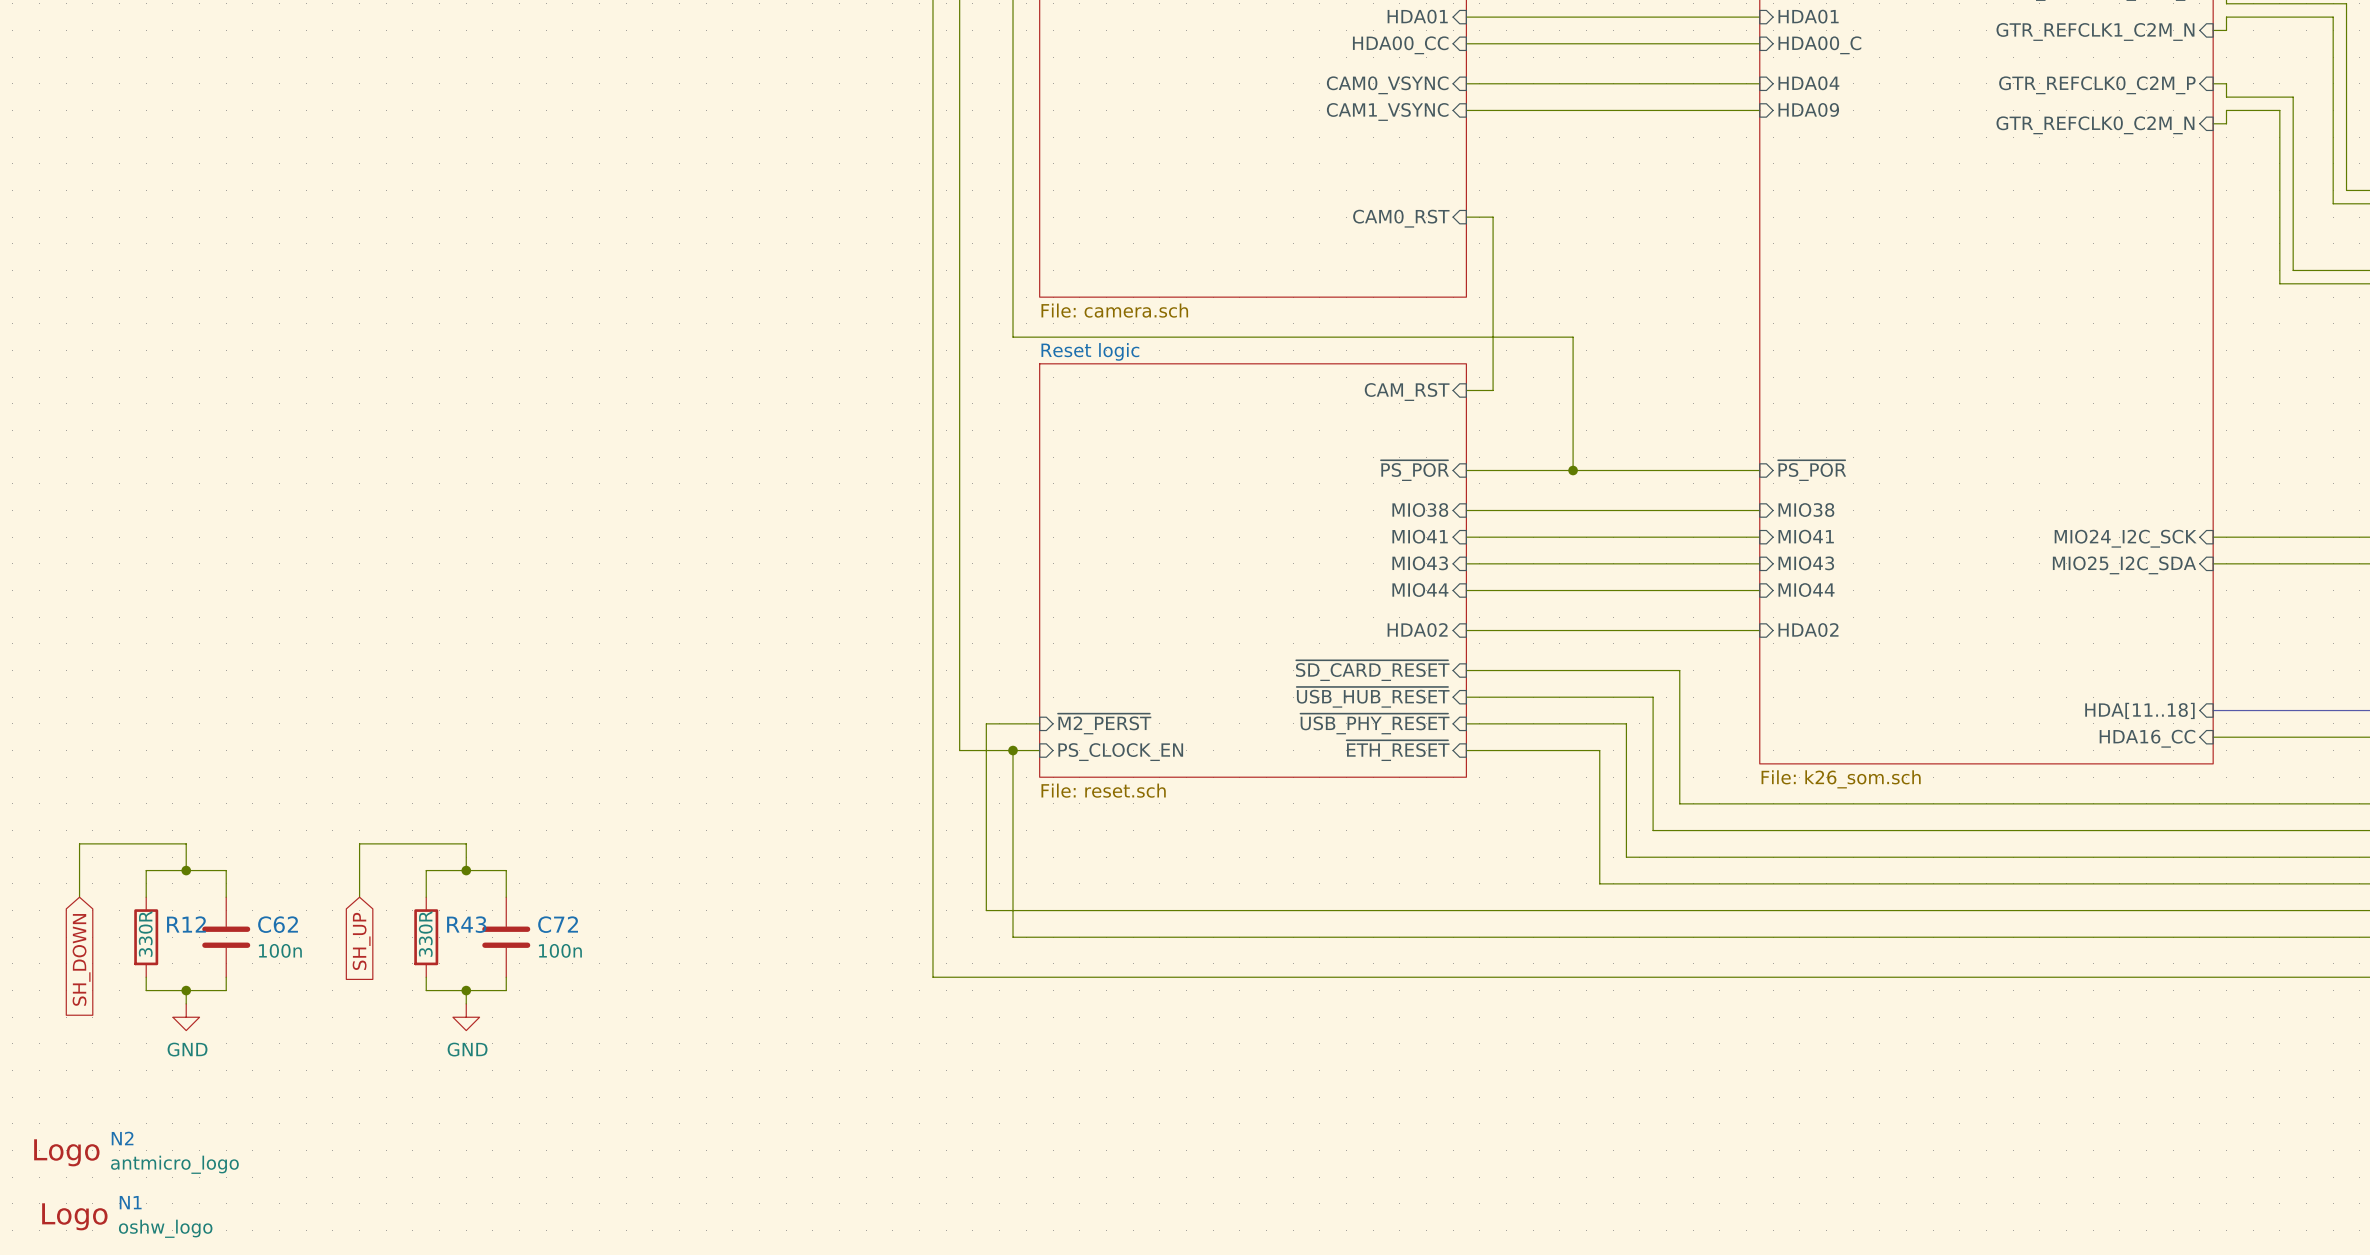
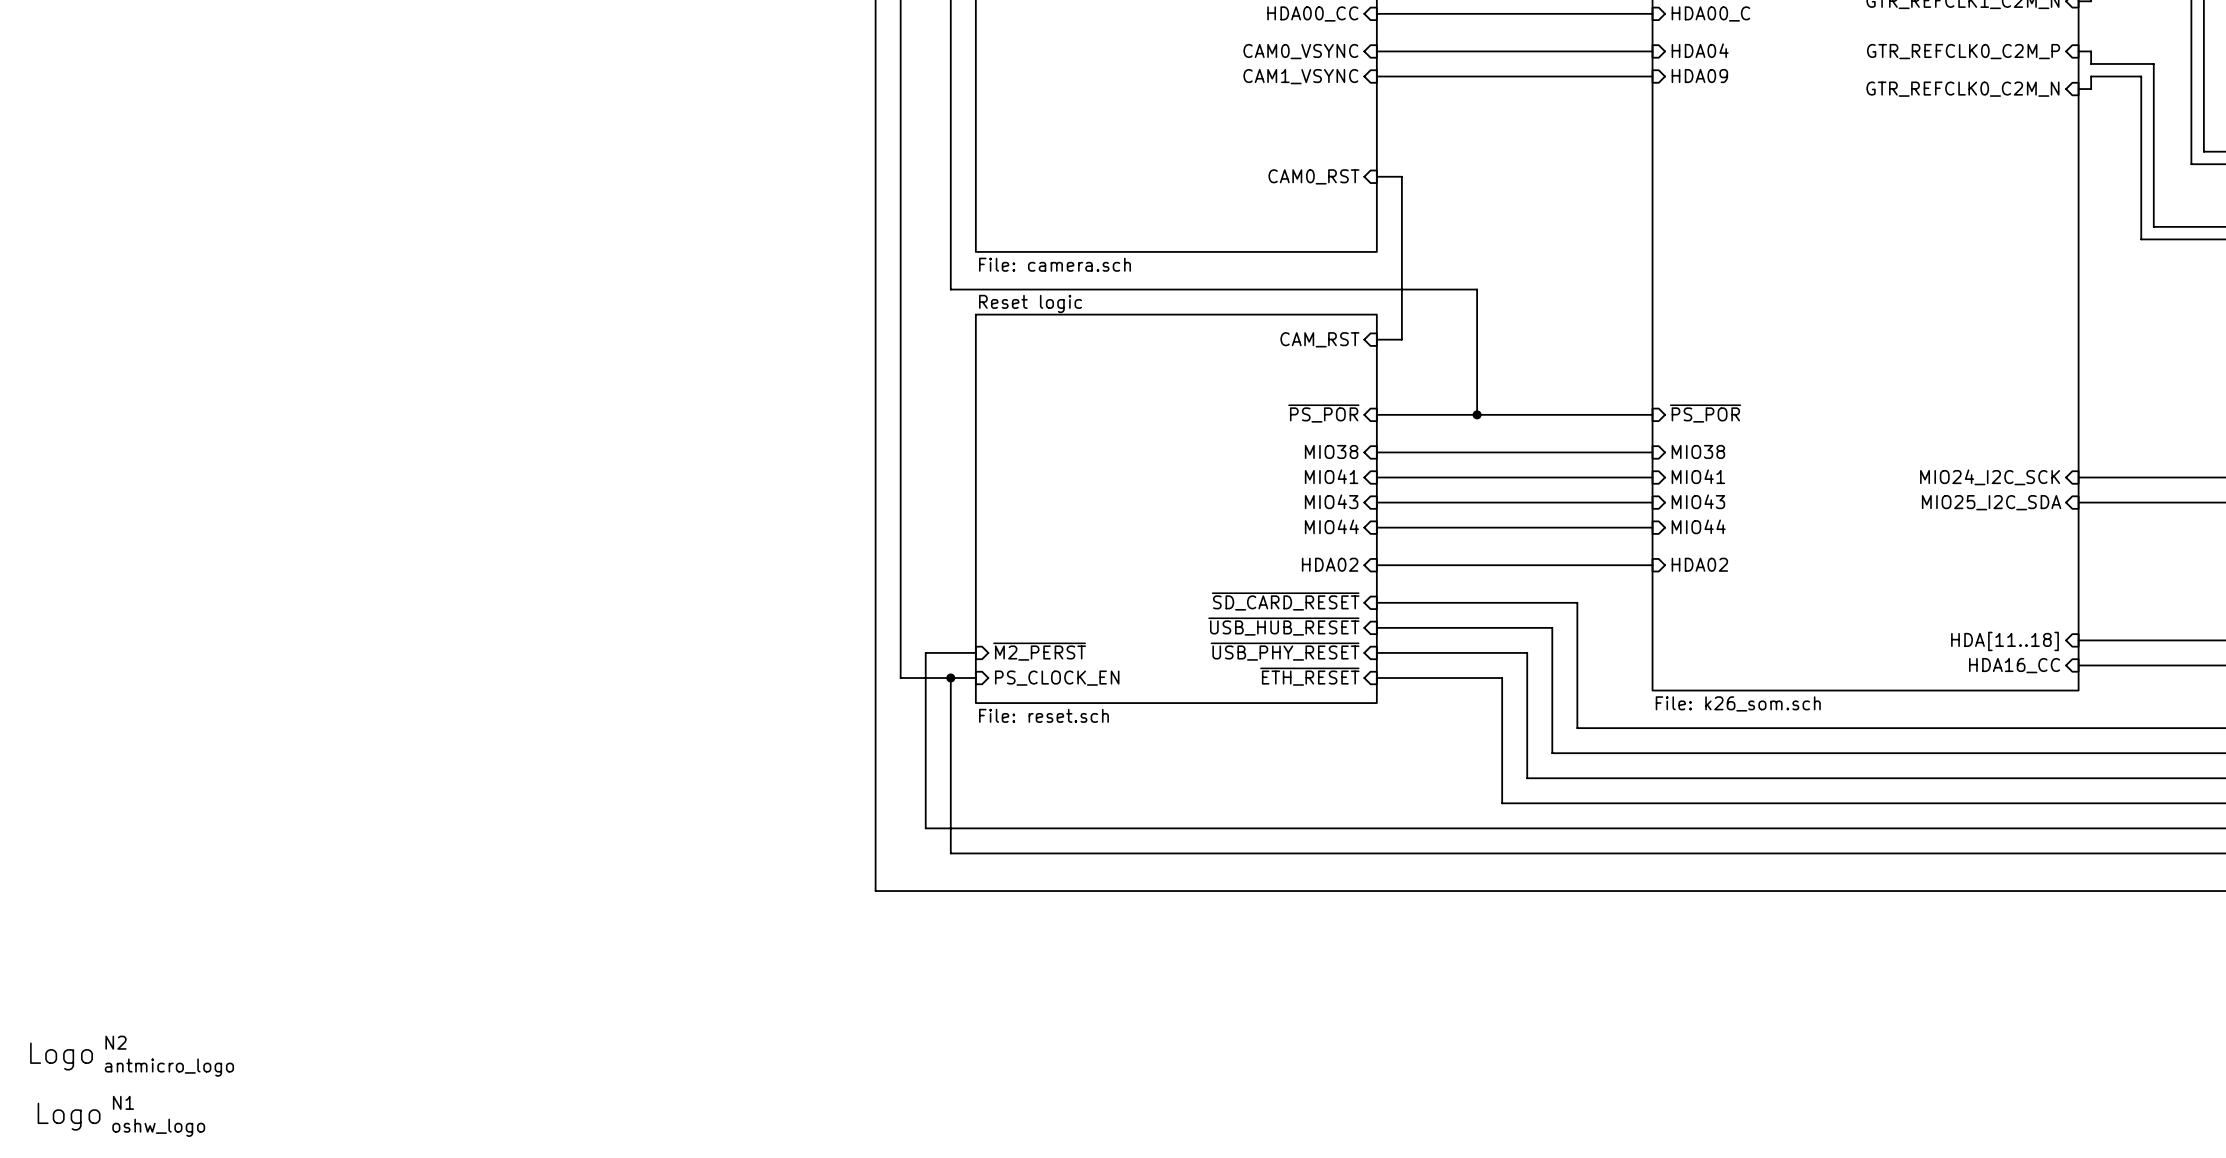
wire: (186, 870) (186, 843) (79, 843) (79, 897) -> none
junction: (186, 870) -> none
wire: (466, 870) (466, 843) (359, 843) (359, 897) -> none
junction: (466, 870) -> none
wire: (146, 897) (146, 870) (226, 870) (226, 897) -> none
wire: (426, 897) (426, 870) (506, 870) (506, 897) -> none
R12: (146, 937) -> none
C62: (226, 937) -> none
R43: (426, 937) -> none
C72: (506, 937) -> none
global label: SH_UP (361, 941) -> none
global label: SH_DOWN (81, 959) -> none
wire: (146, 977) (146, 990) (226, 990) (226, 977) -> none
wire: (426, 977) (426, 990) (506, 990) (506, 977) -> none
wire: (186, 990) (186, 1003) -> none
junction: (186, 990) -> none
wire: (466, 990) (466, 1003) -> none
junction: (466, 990) -> none
power symbol: GND (186, 1017) -> none
power symbol: GND (466, 1017) -> none

